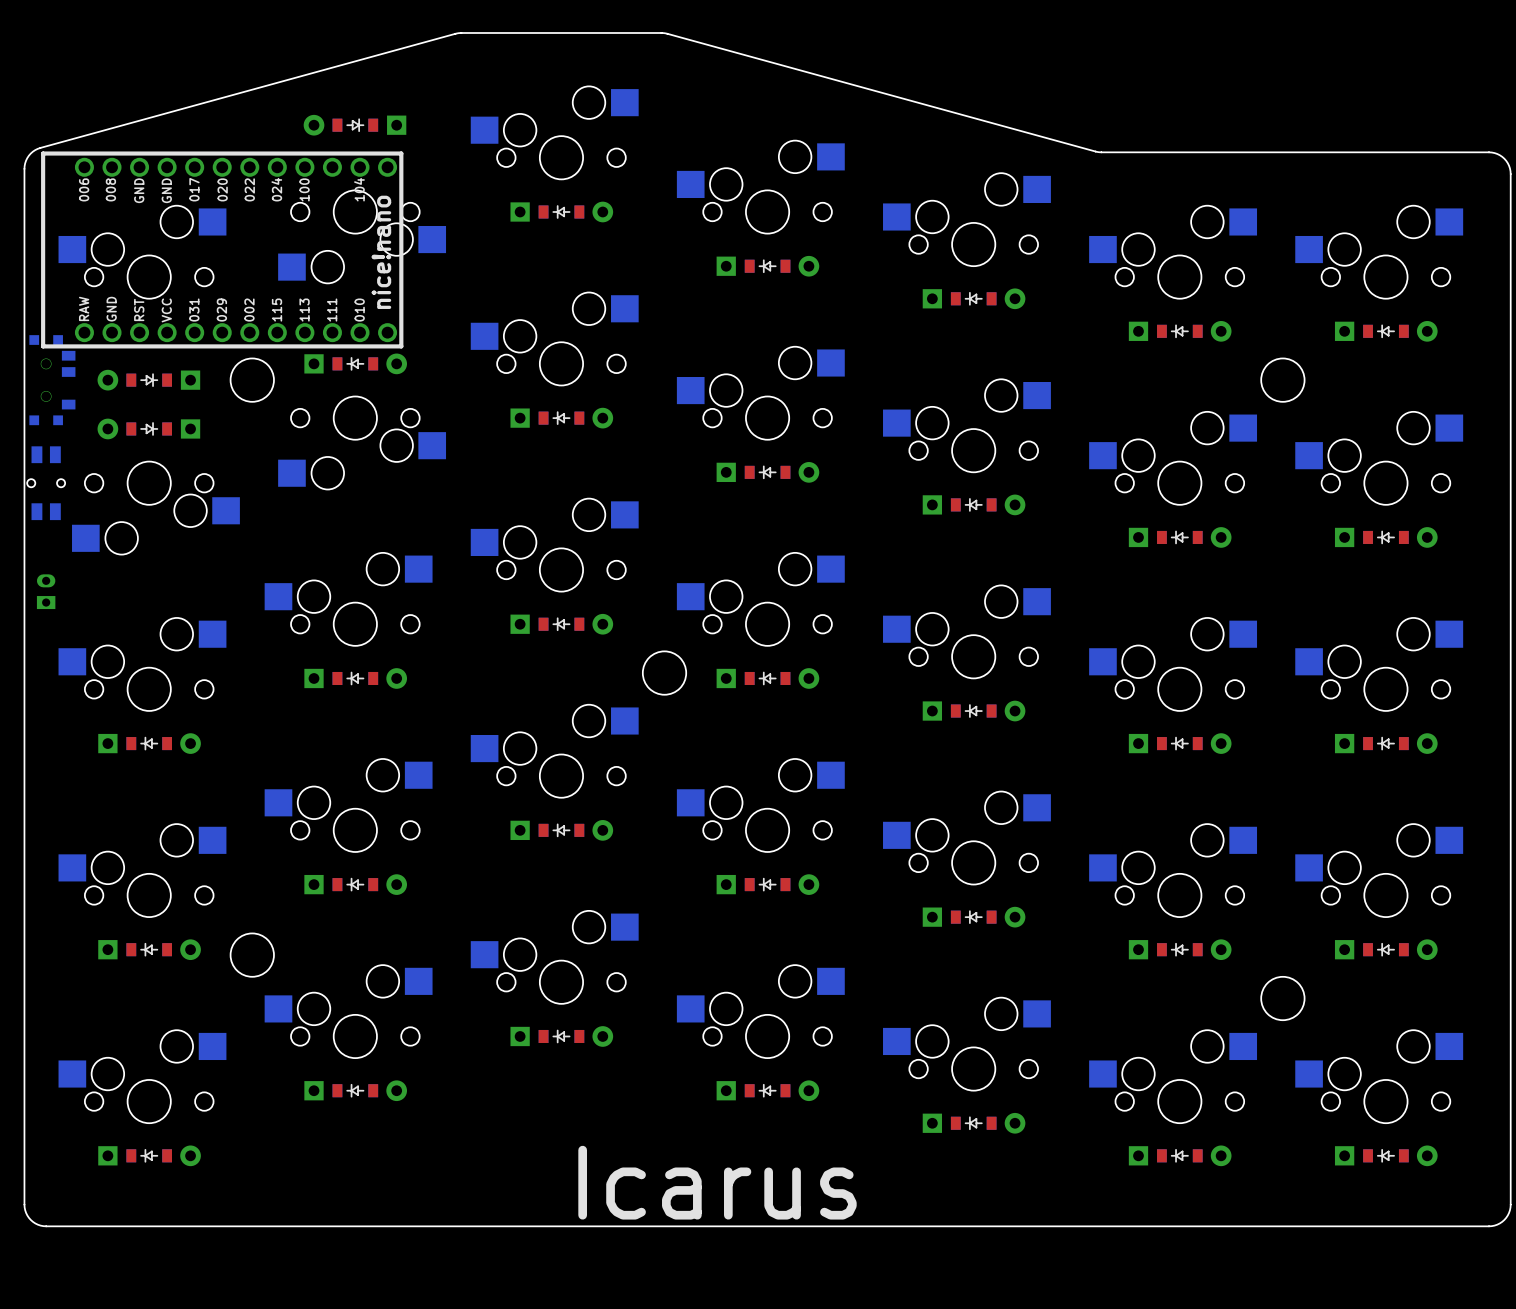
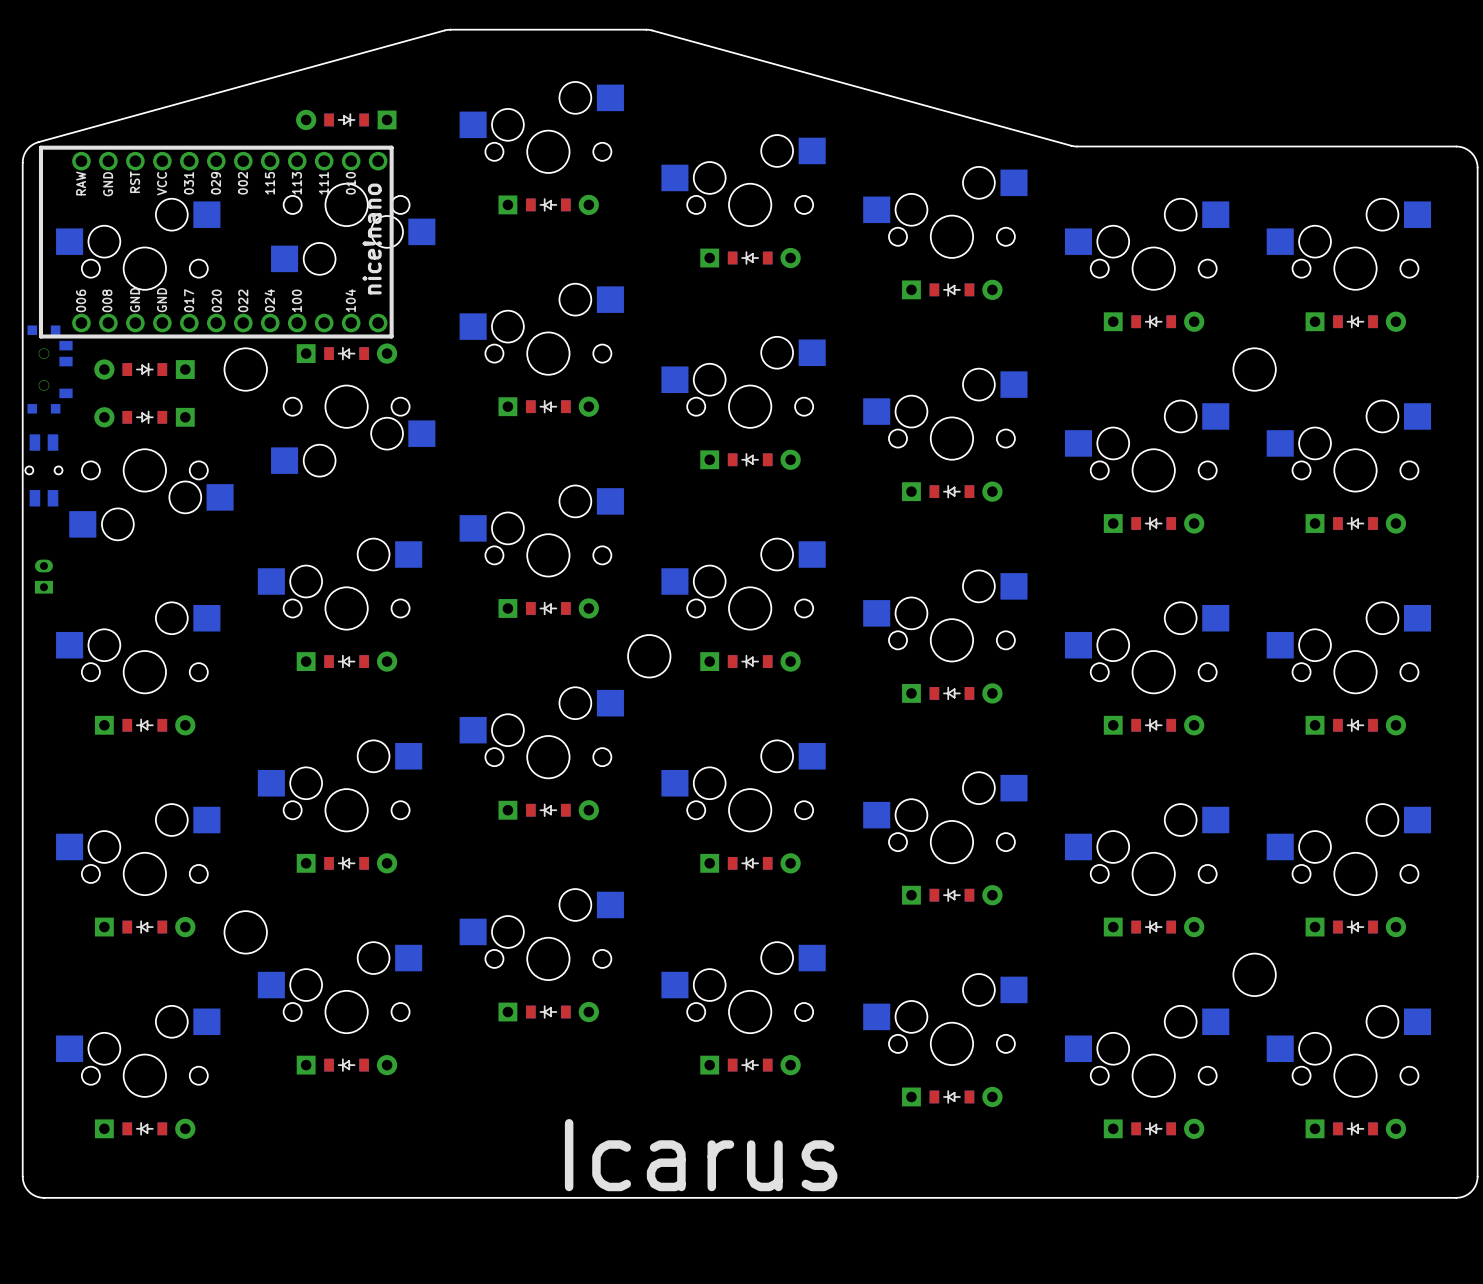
part footprint: [41, 151, 404, 349] -> [38, 145, 394, 339]

